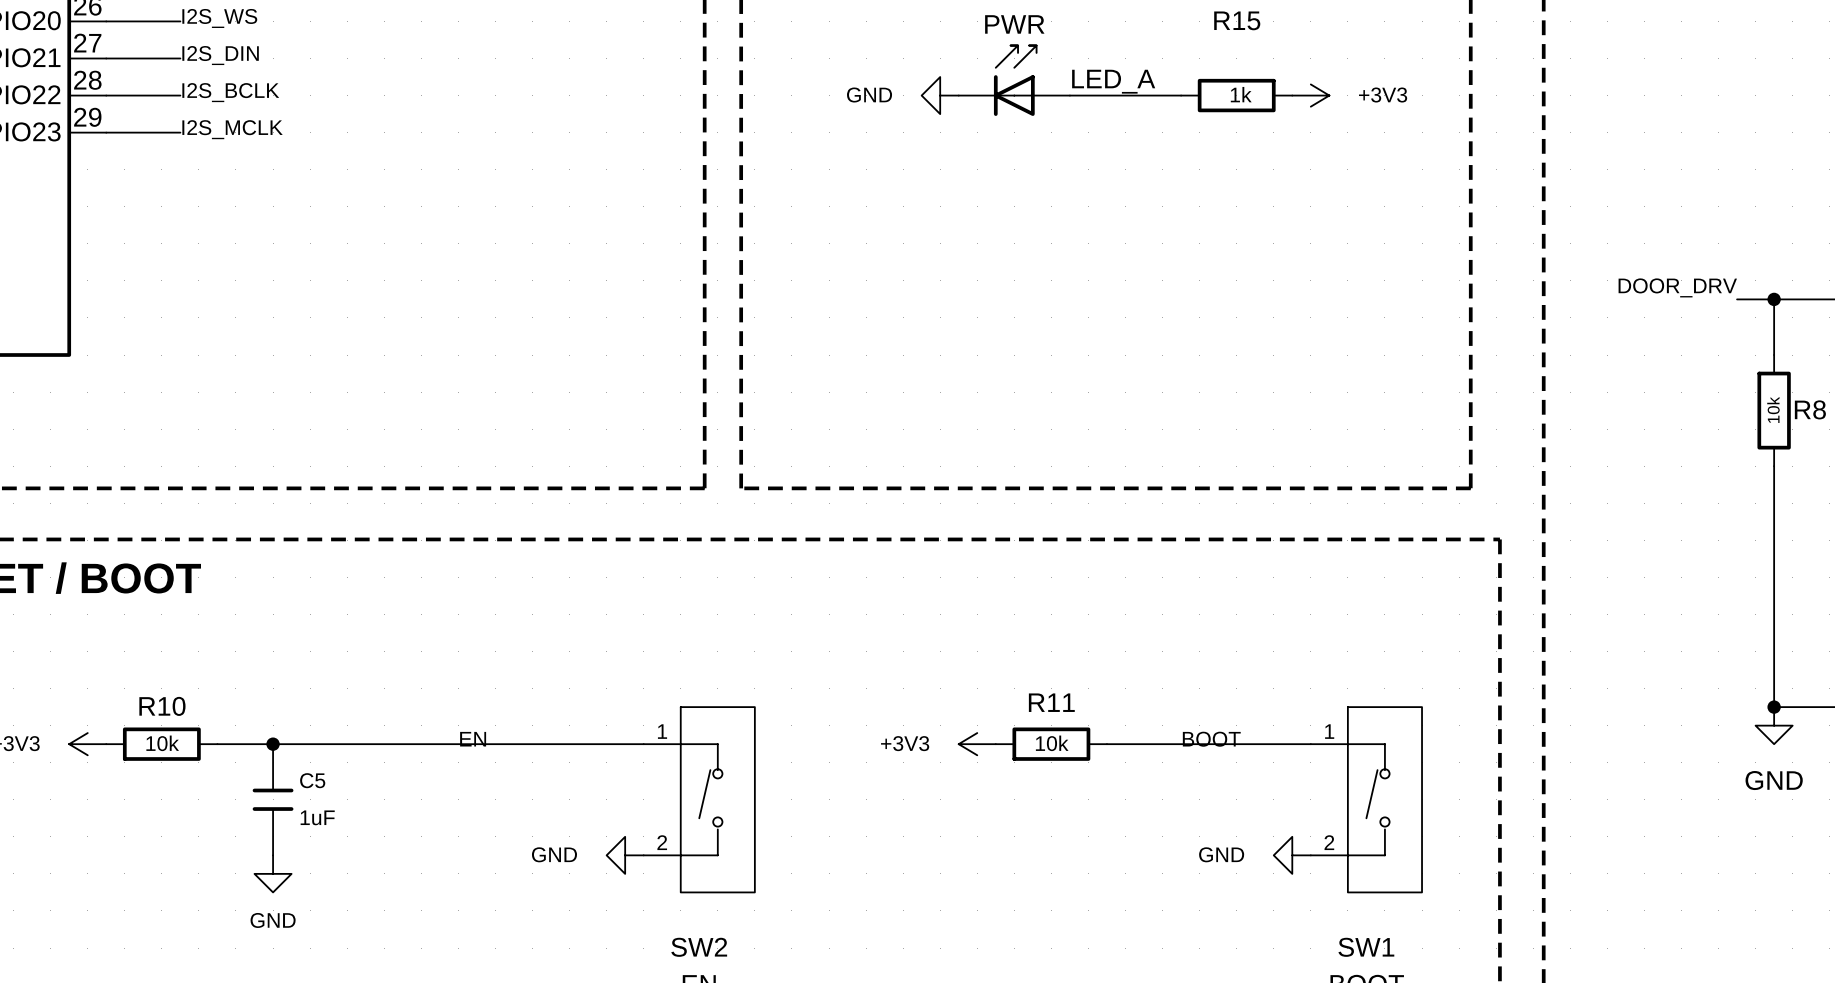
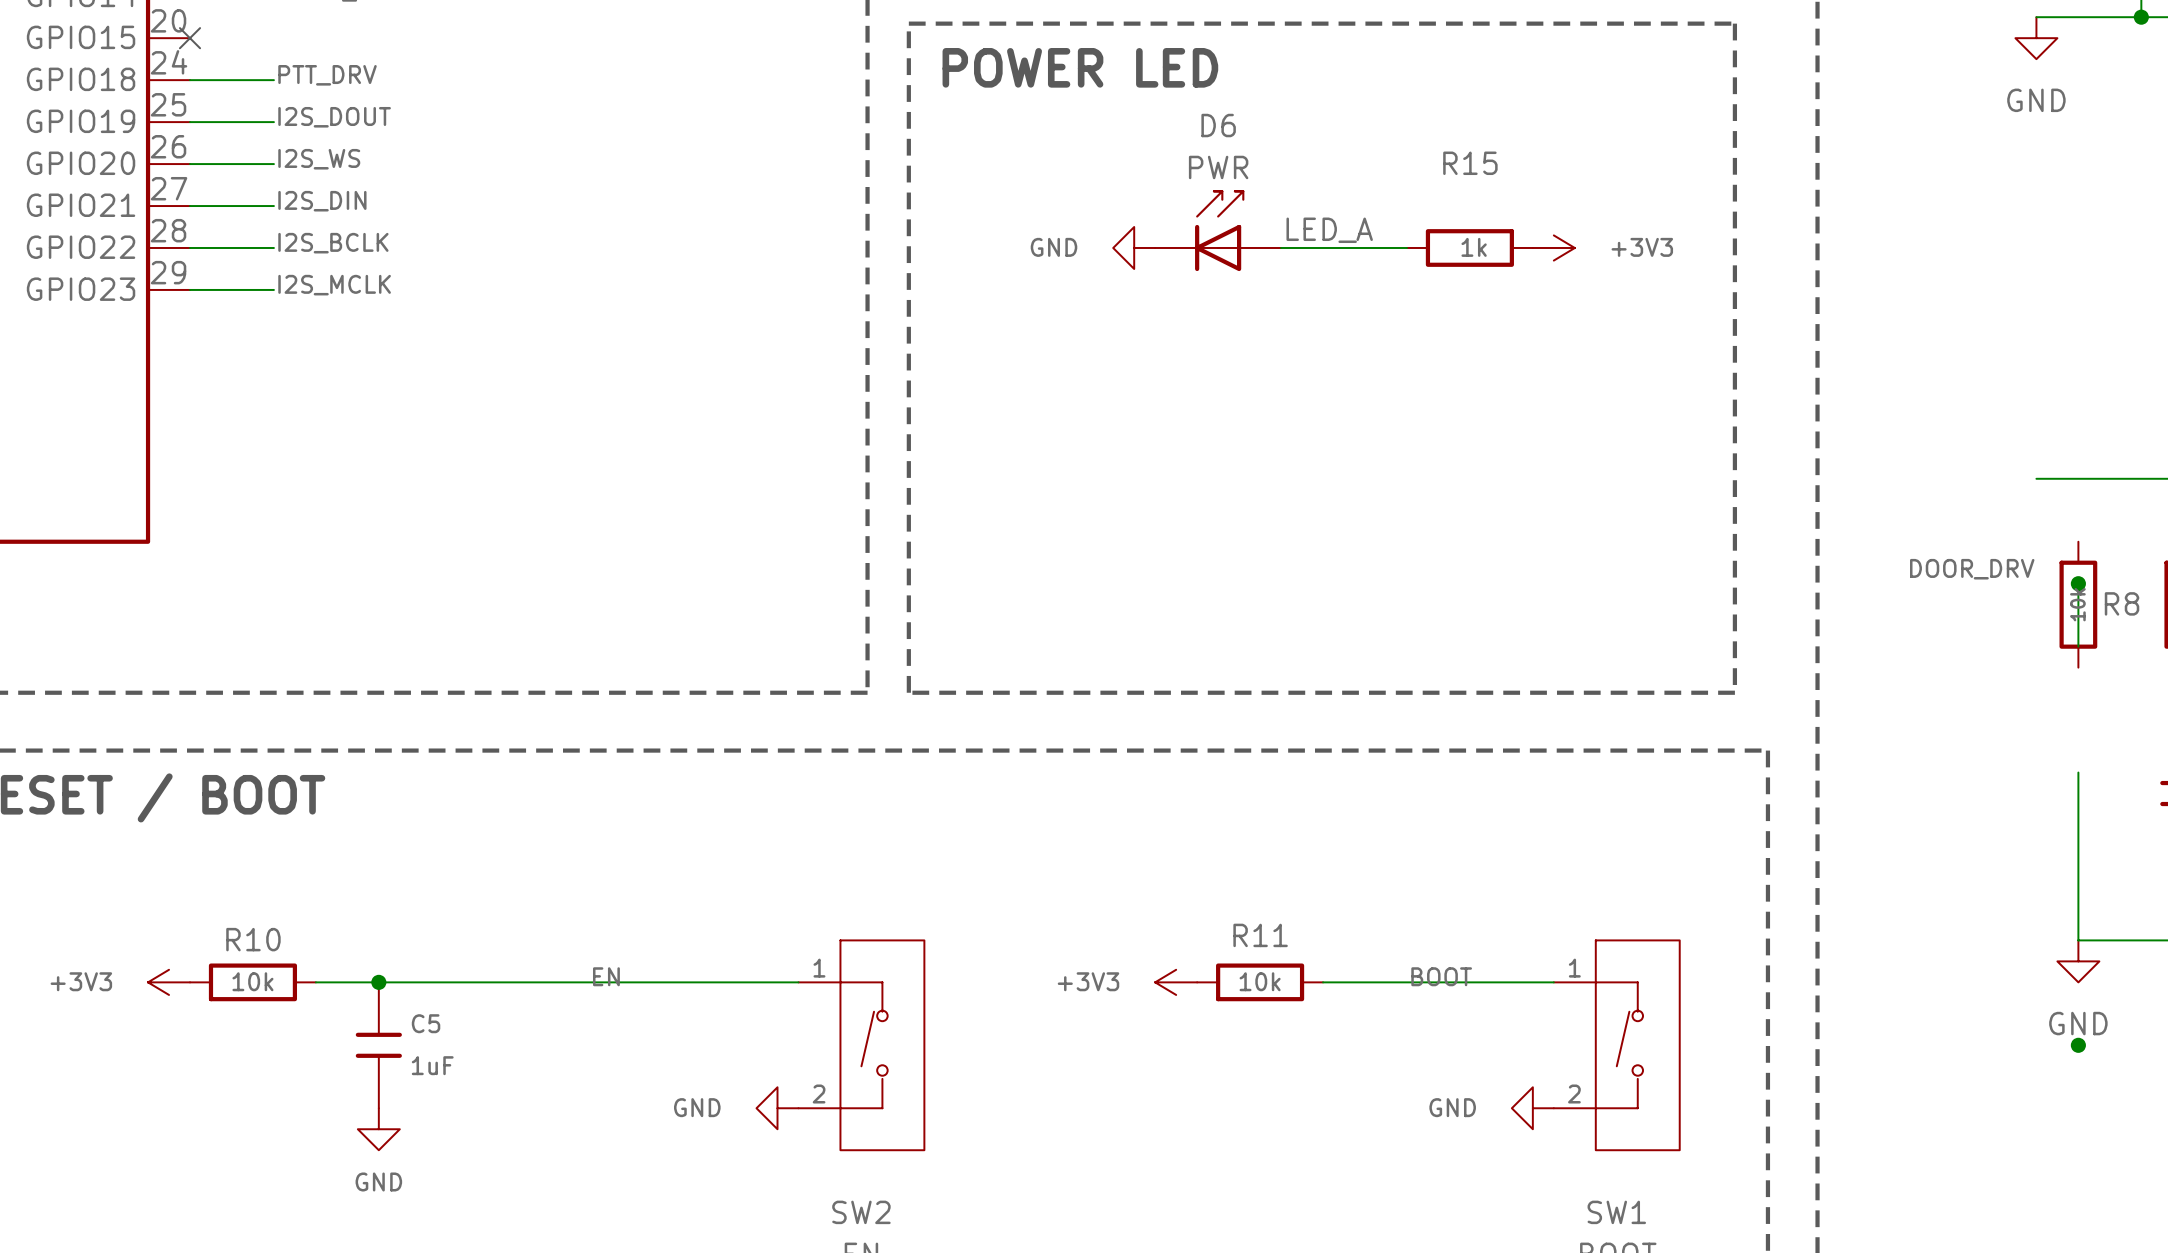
label position: DOOR_DRV (1677, 287) -> DOOR_DRV (1972, 569)
wire: (1774, 299) (1774, 355) -> (2078, 583) (2078, 646)
junction: (1774, 299) -> none
junction: none -> (2078, 583)
wire: (1774, 466) (1774, 558) -> none
junction: (1774, 707) -> none
junction: none -> (2078, 1045)

